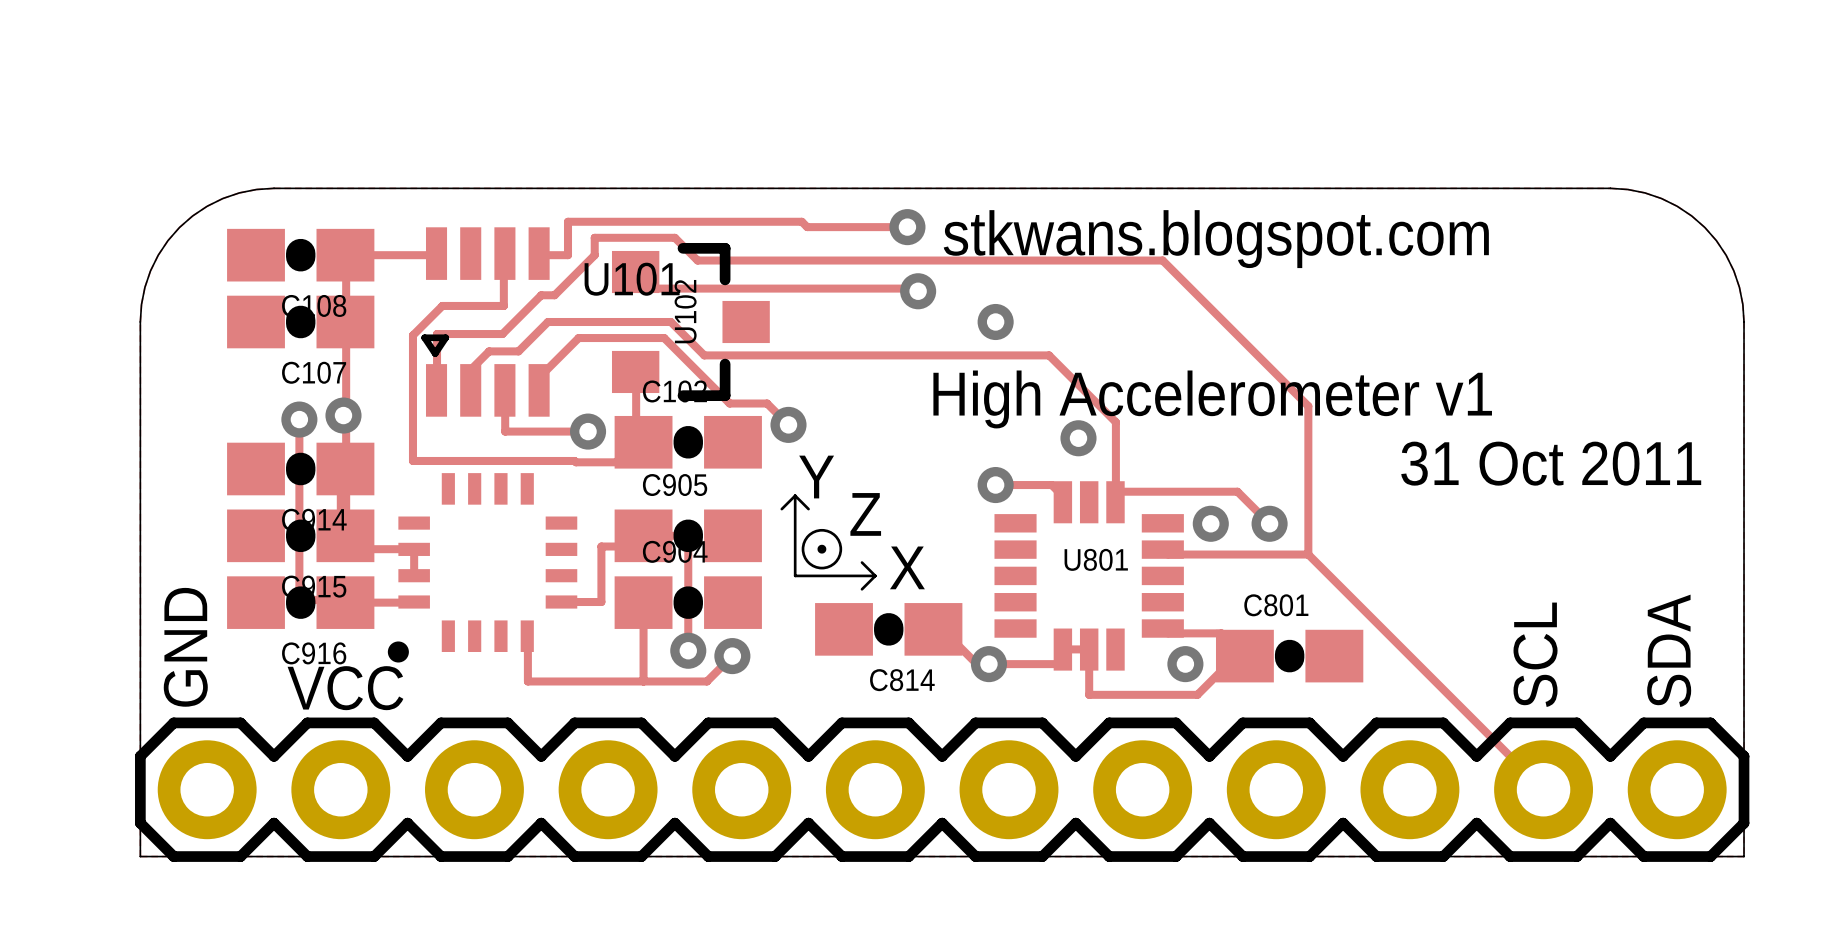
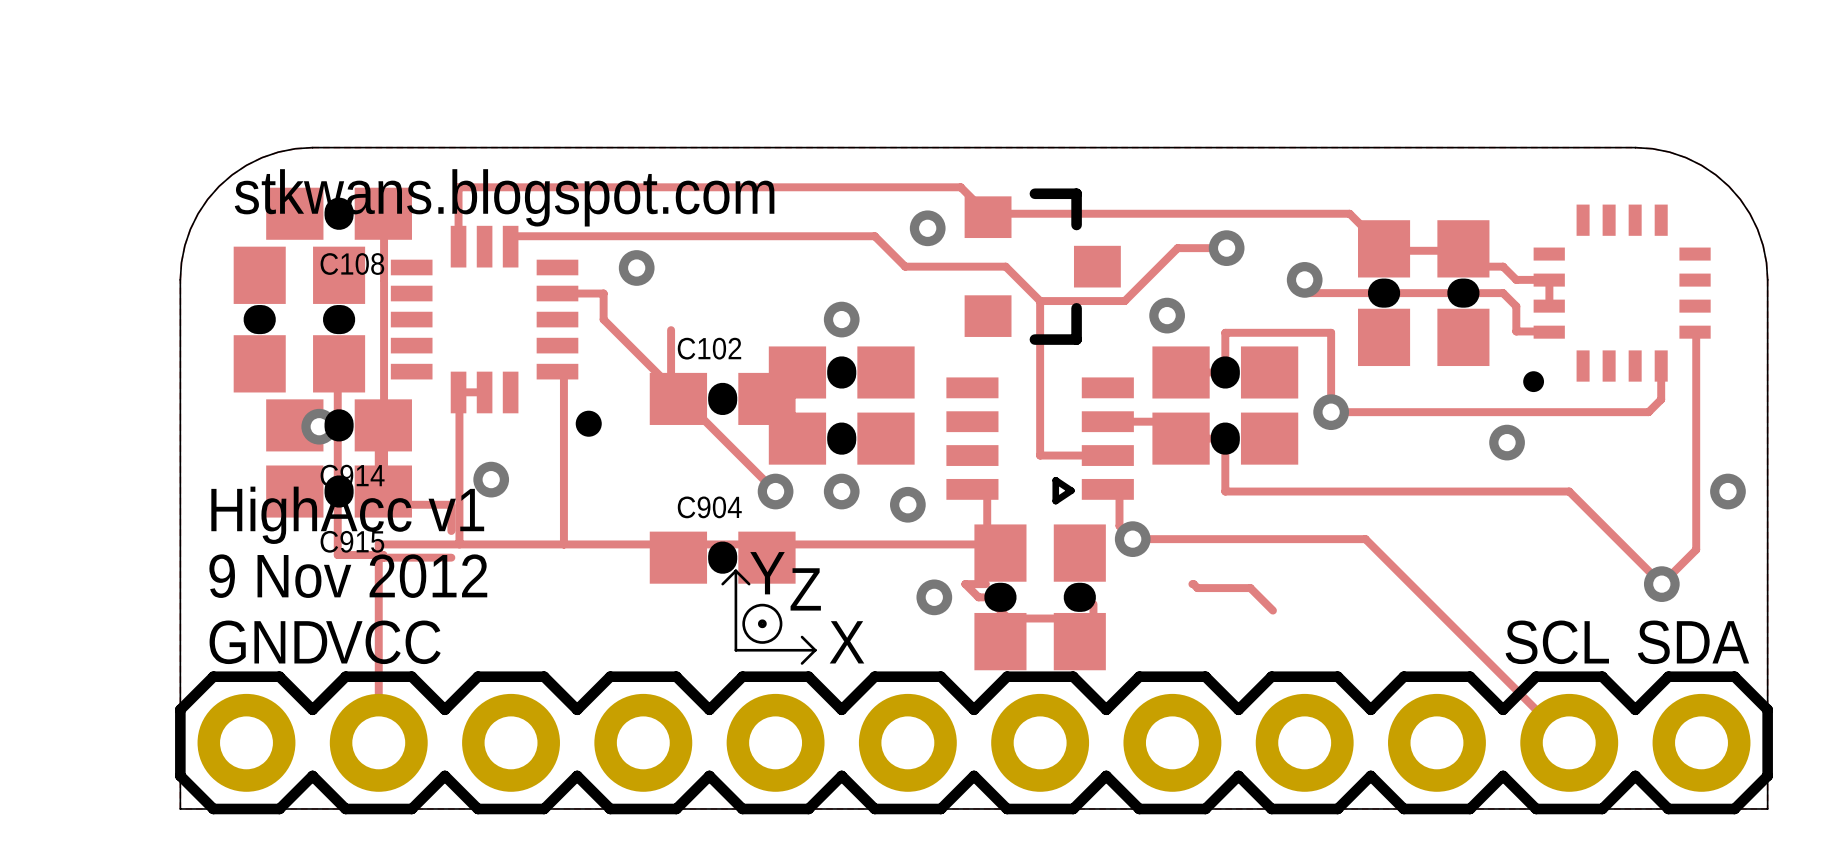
track: (907, 227) (807, 227) (801, 221) (568, 221) (568, 255) (539, 253) -> none
via: (907, 227) -> none
text position: stkwans.blogspot.com (1216, 239) -> stkwans.blogspot.com (504, 197)
track: (435, 253) (434, 255) (345, 255) -> none
track: (503, 253) (503, 305) (442, 305) (412, 335) (412, 460) (616, 462) (633, 444) (633, 442) (643, 442) -> none
track: (636, 272) (652, 288) (915, 288) (918, 291) -> none
track: none -> (458, 245) (458, 187) (960, 187) (988, 214) (988, 217) (991, 213) (1349, 213) (1384, 248)
track: none -> (511, 245) (510, 236) (874, 236) (905, 266) (1005, 266) (1040, 301)
track: none -> (1226, 248) (1177, 248) (1124, 301) (1040, 301)
via: none -> (1226, 248)
track: none -> (1384, 248) (1386, 250) (1460, 250) (1463, 248) (1467, 259) (1474, 265) (1503, 266) (1516, 279) (1545, 278) (1549, 280) (1549, 306)
via position: (918, 291) -> (927, 228)
part: none -> (1042, 266)
via: none -> (636, 267)
C107: (300, 322) -> none
U101: (485, 322) -> none
U102: (690, 322) -> none
via: (995, 322) -> none
track: none -> (1304, 279) (1304, 293) (1503, 293) (1516, 306) (1516, 331) (1549, 332)
via: none -> (1304, 279)
part: none -> (1384, 293)
part: none -> (1463, 293)
track: none -> (558, 294) (603, 293) (603, 319) (775, 491)
track: none -> (1040, 301) (1040, 455) (1107, 455)
via: none -> (1167, 315)
part: none -> (259, 319)
part: none -> (339, 319)
via: none -> (841, 319)
part: none -> (496, 331)
track: none -> (1695, 332) (1696, 549) (1661, 584) (1569, 491) (1225, 491) (1225, 438) (1181, 438) (1181, 421) (1107, 421)
track: (437, 390) (437, 334) (502, 334) (541, 295) (554, 295) (594, 255) (594, 237) (674, 237) (697, 260) (1162, 260) (1308, 406) (1308, 554) -> none
track: (471, 390) (471, 368) (489, 351) (518, 351) (547, 322) (670, 322) (704, 355) (1049, 355) (1115, 422) (1115, 501) -> none
track: (505, 390) (505, 431) (588, 431) -> none
track: (539, 390) (539, 376) (578, 338) (664, 338) (729, 403) (767, 403) (788, 424) -> none
text: High Accelerometer v1 (1212, 399) -> none
track: none -> (1661, 366) (1661, 399) (1648, 412) (1331, 412) (1331, 332) (1225, 332) (1225, 372) (1181, 372)
track: none -> (557, 371) (563, 372) (563, 544)
via: (343, 415) -> none
part: none -> (841, 372)
part: none -> (1225, 372)
via: (299, 419) -> none
via: (788, 424) -> none
via: (588, 431) -> none
track: none -> (484, 392) (459, 392) (459, 544)
via: (1078, 438) -> none
via: none -> (1331, 412)
text: 31 Oct 2011 (1551, 463) -> none
via: none -> (319, 426)
text: Y (816, 477) -> none
part: none -> (841, 438)
part: none -> (1225, 438)
part: none -> (1040, 440)
track: (995, 485) (1051, 485) (1062, 495) (1062, 502) -> none
via: (995, 485) -> none
via: none -> (1507, 442)
line: (795, 495) (795, 575) (875, 575) -> none
line: (795, 495) (808, 509) -> none
line: (795, 495) (781, 509) -> none
track: (1115, 502) (1118, 502) (1118, 491) (1237, 491) (1269, 523) -> none
text: Z (865, 514) -> none
via: none -> (491, 479)
via: (1210, 523) -> none
via: (1269, 523) -> none
drawing: [801, 528, 843, 570] -> none
track: none -> (968, 490) (987, 489) (987, 544) (378, 544) (378, 742)
C905: (688, 535) -> none
via: none -> (775, 491)
via: none -> (841, 491)
via: none -> (1727, 491)
via: none -> (907, 504)
track: (1164, 550) (1168, 554) (1308, 554) -> none
track: (1308, 554) (1337, 583) -> (1107, 489) (1119, 489) (1119, 525) (1132, 539) (1365, 539)
text: none -> HighAcc v1 (347, 515)
line: (862, 562) (875, 575) -> none
part position: (482, 567) -> (1616, 298)
text: X (907, 567) -> none
line: (875, 575) (862, 589) -> none
U801: (1089, 575) -> none
via: none -> (1132, 539)
C916: (300, 602) -> none
track: (561, 602) (601, 602) (601, 546) (632, 546) (642, 535) (688, 535) (688, 650) -> none
track: (643, 602) (643, 681) -> none
drawing: none -> [721, 569, 817, 665]
text: none -> 9 Nov 2012 (348, 576)
C814: (888, 629) -> none
via: none -> (1661, 584)
track: (527, 637) (527, 681) (706, 681) (732, 656) -> none
via: none -> (934, 597)
part: none -> (1000, 597)
part: none -> (1079, 597)
text rotation: 0° (185, 647) -> 90° clockwise (268, 642)
track: (1063, 649) (1089, 649) (1089, 694) (1197, 694) (1237, 654) (1244, 656) -> none
via: (688, 650) -> none
text rotation: 0° (1669, 650) -> 90° clockwise (1693, 642)
text rotation: 0° (1535, 654) -> 90° clockwise (1557, 642)
via: (732, 656) -> none
C801: (1289, 656) -> none
via: (988, 664) -> none
via: (1185, 664) -> none

